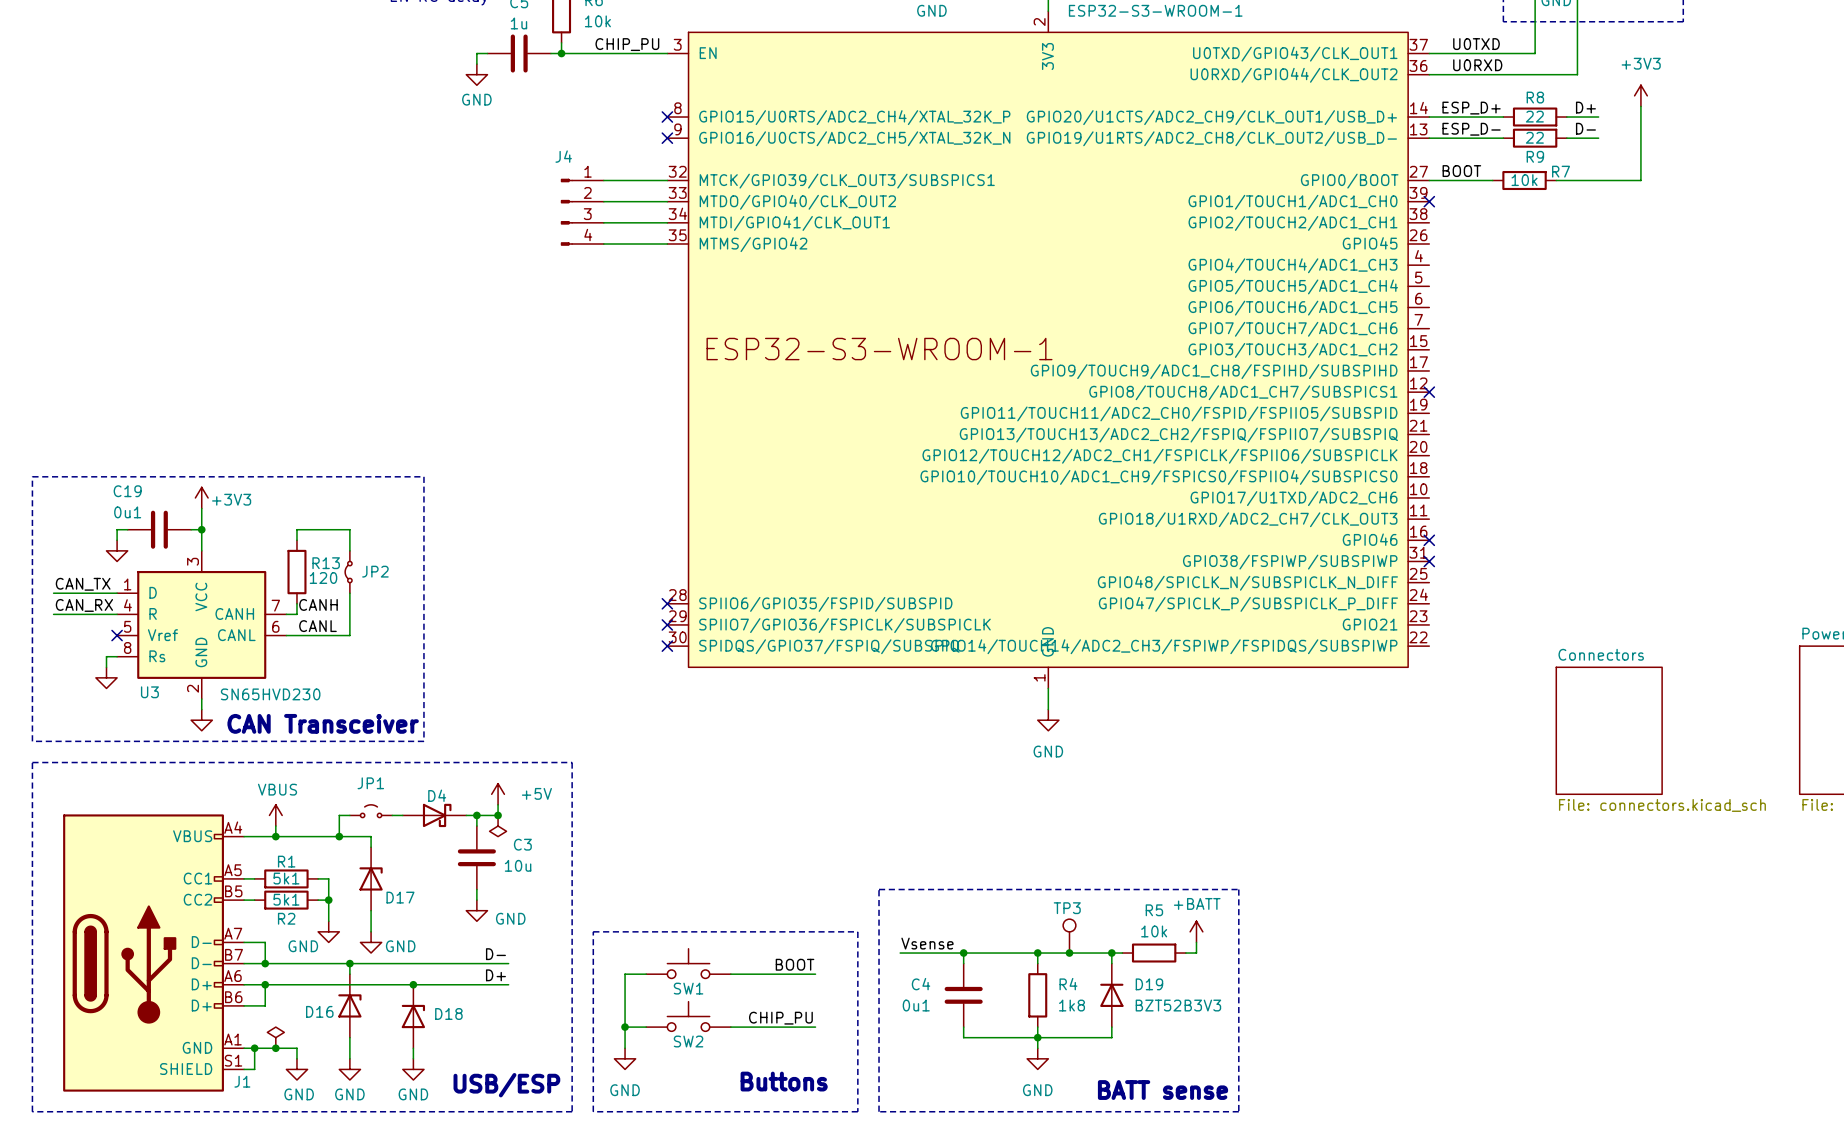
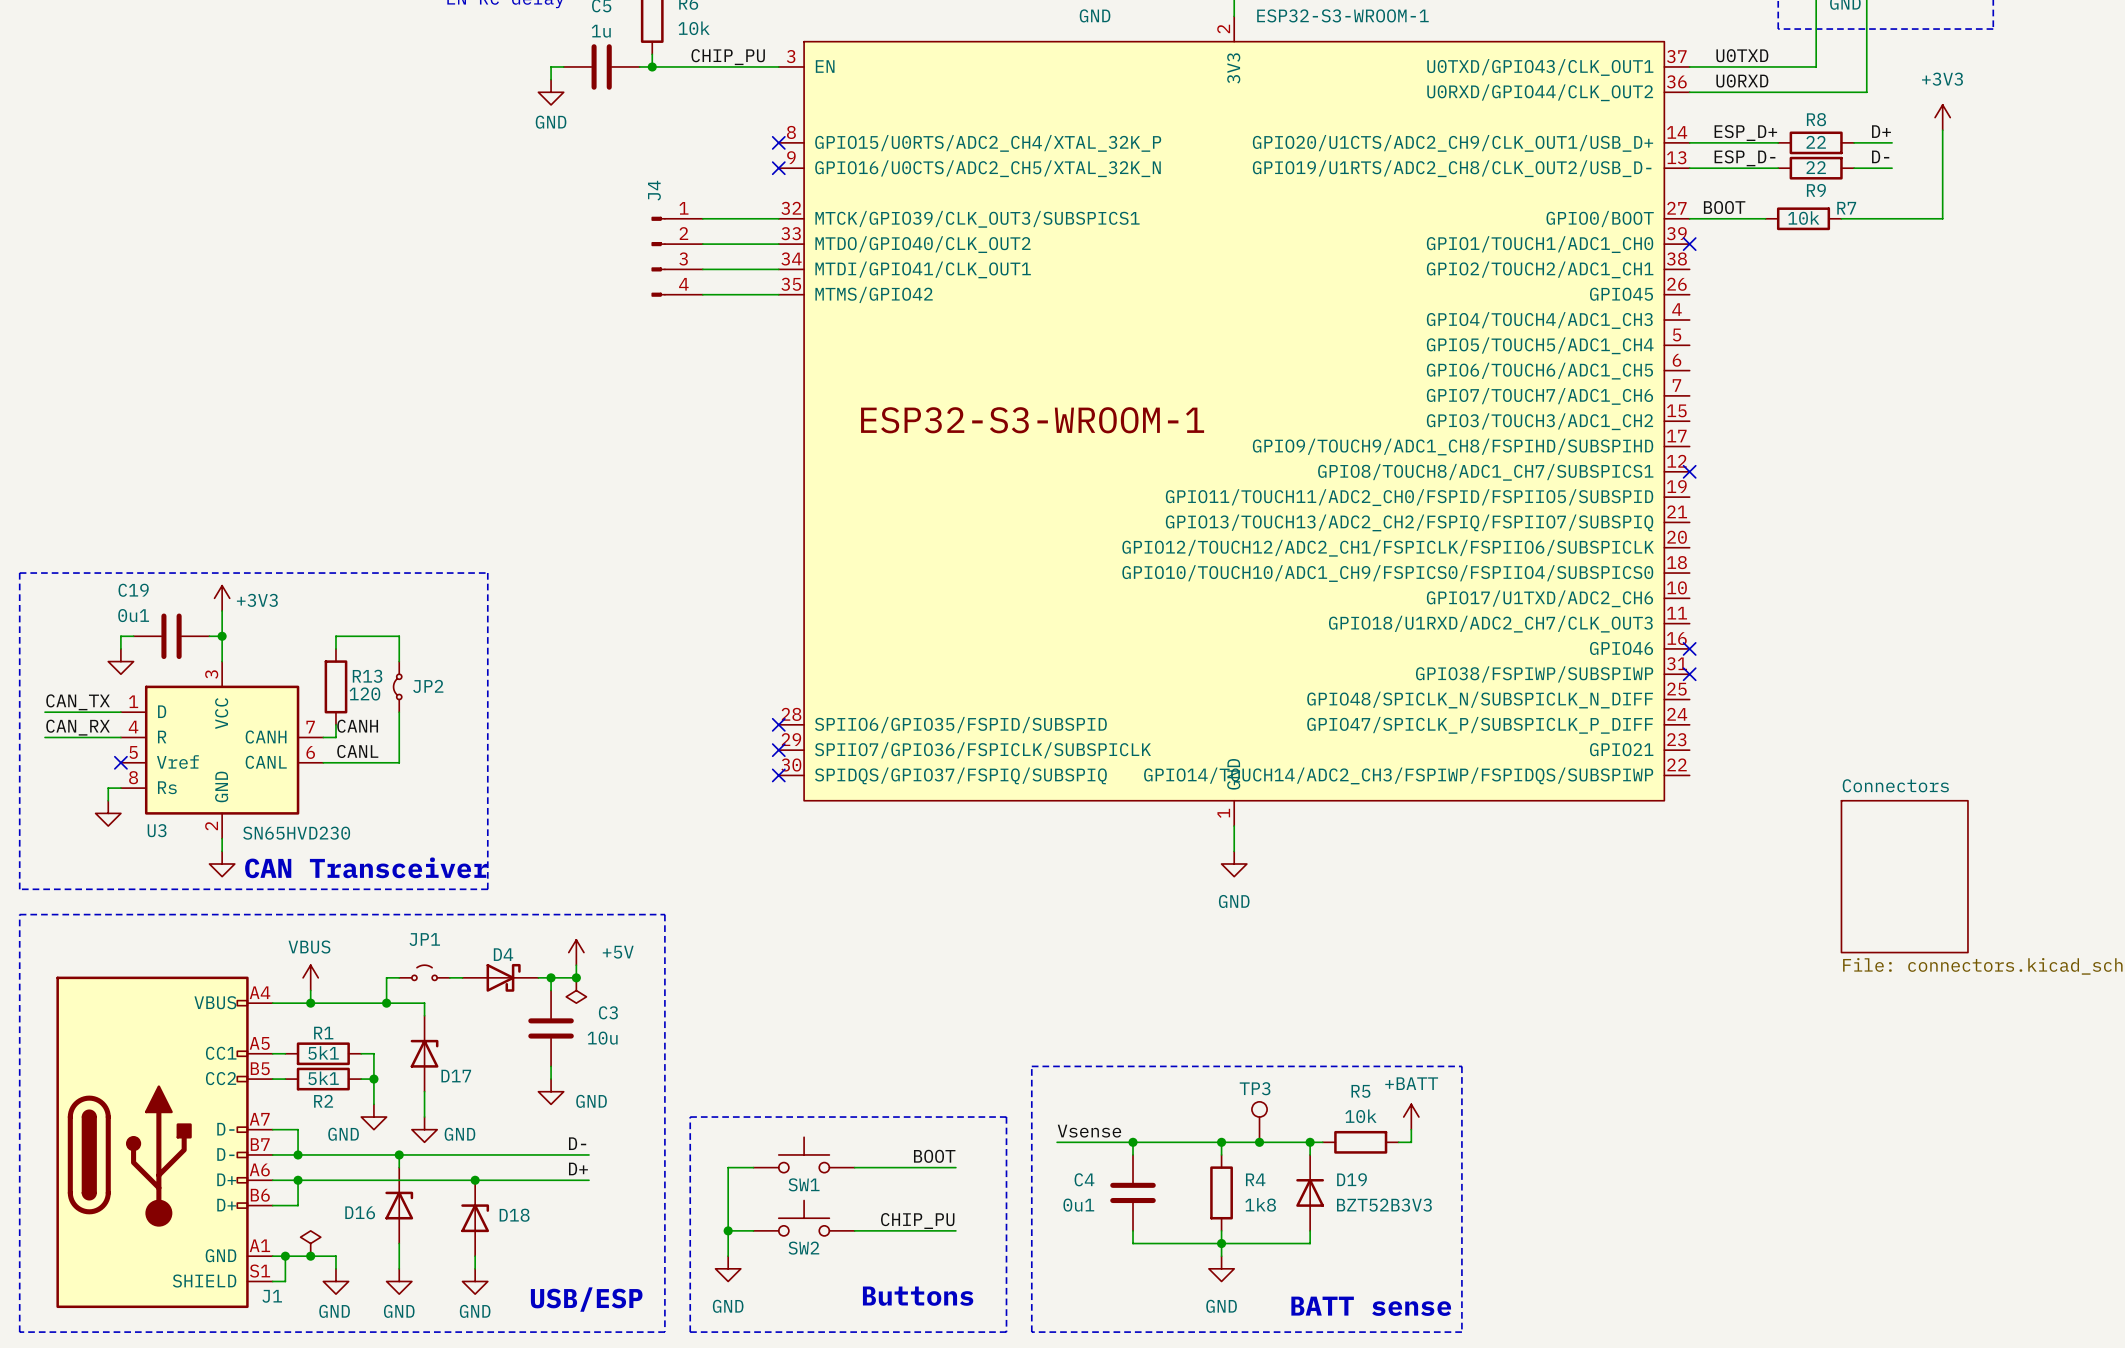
J4 name rotation: 0° (563, 156) -> 90° counterclockwise (654, 190)

